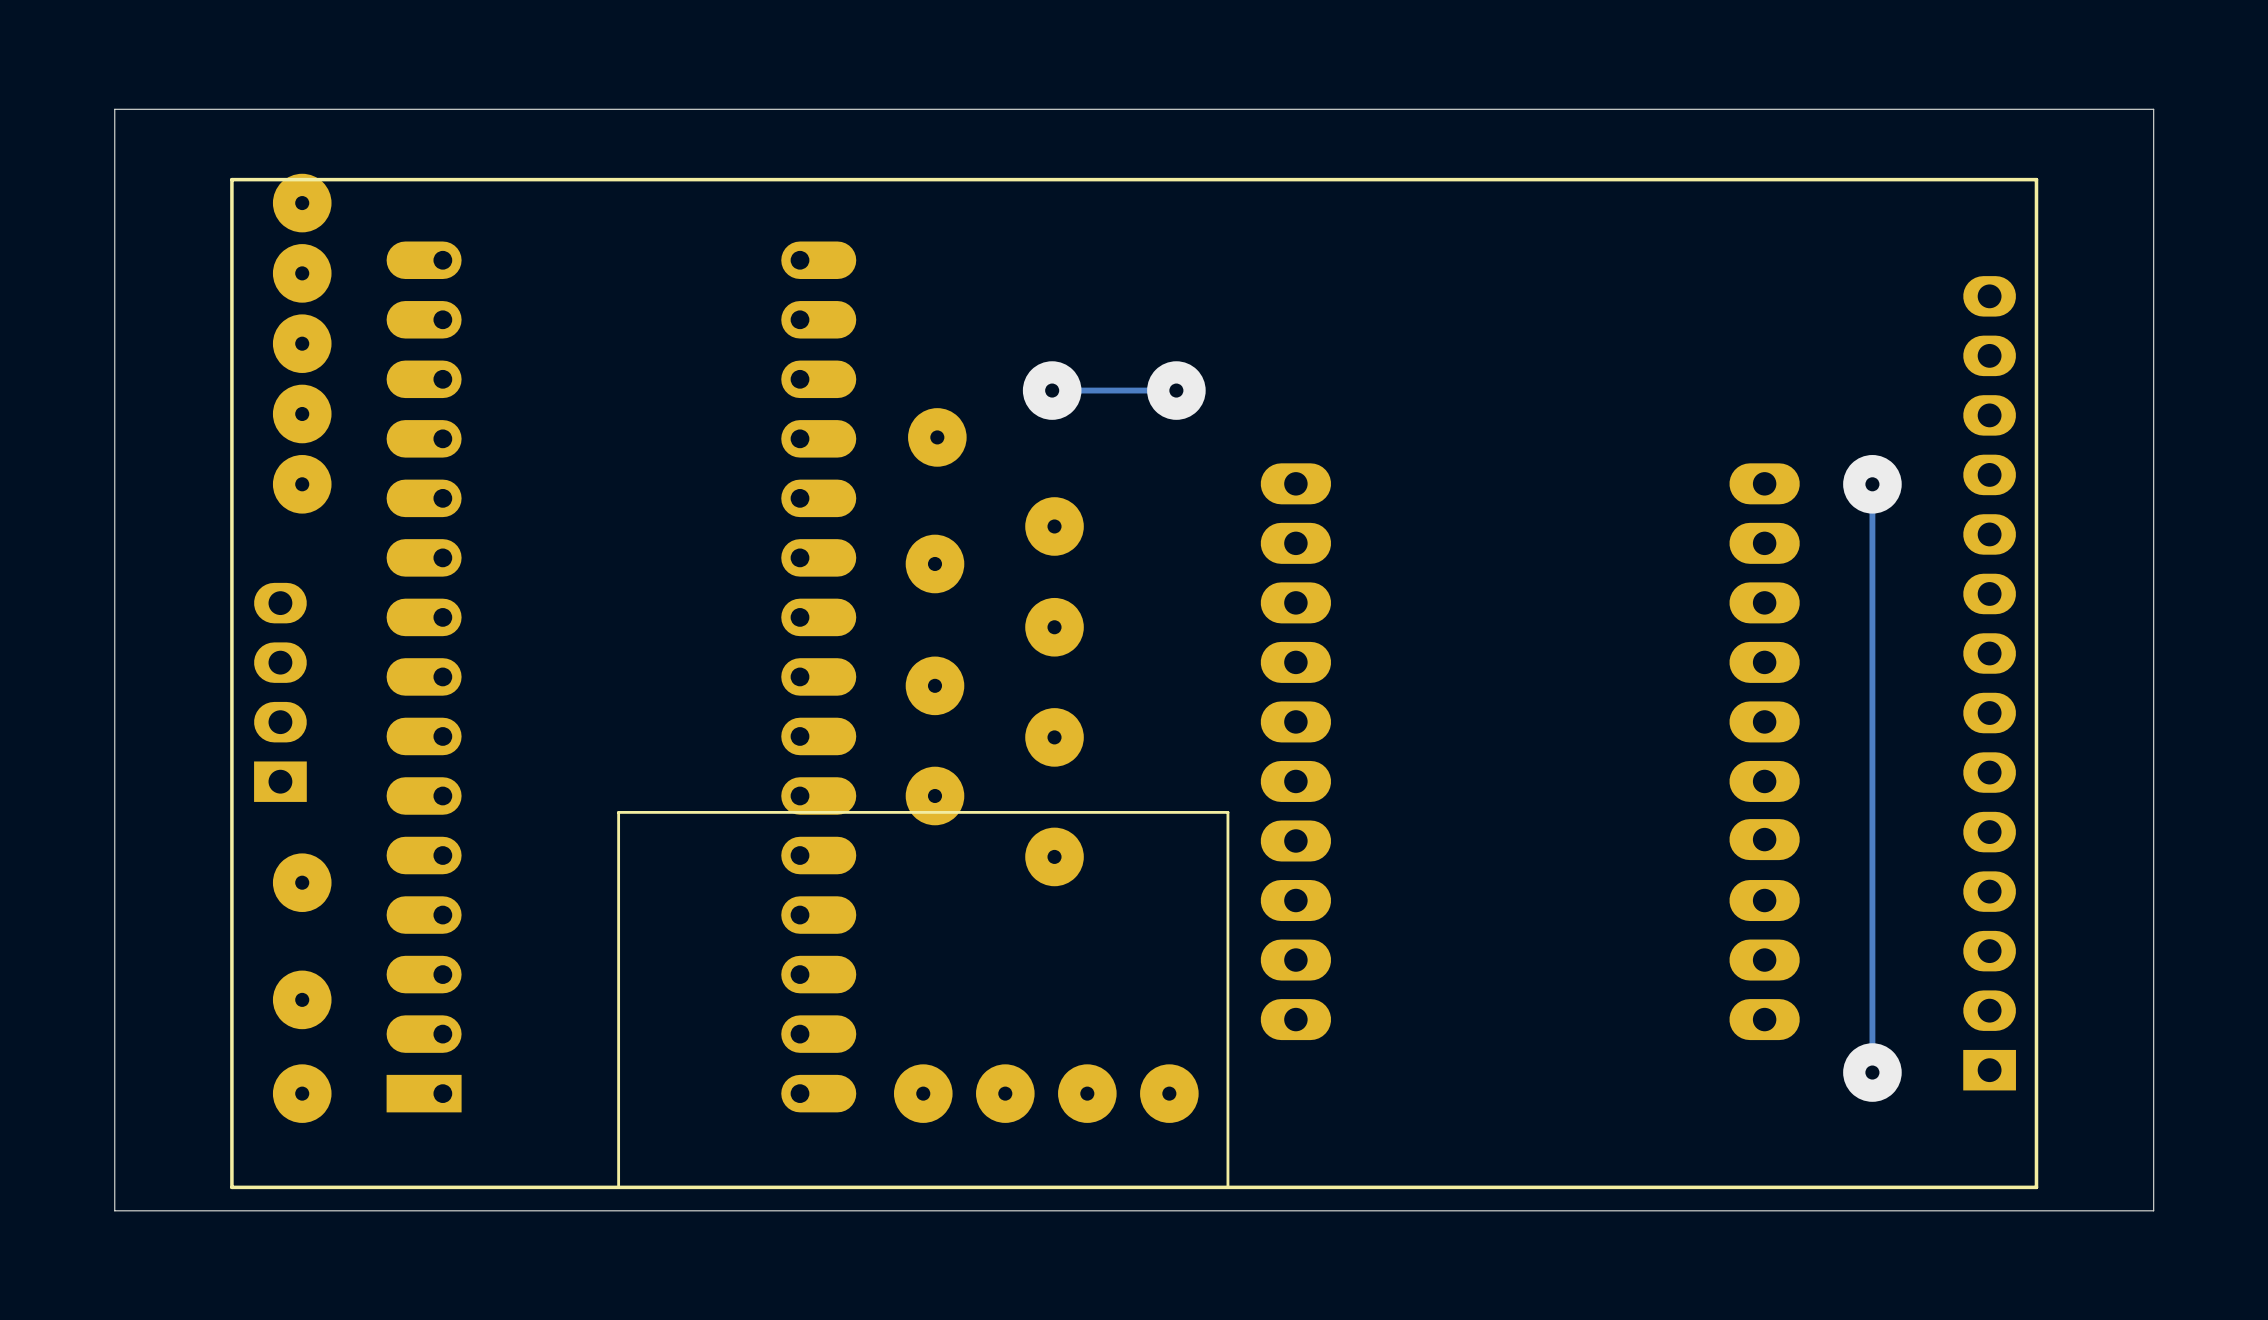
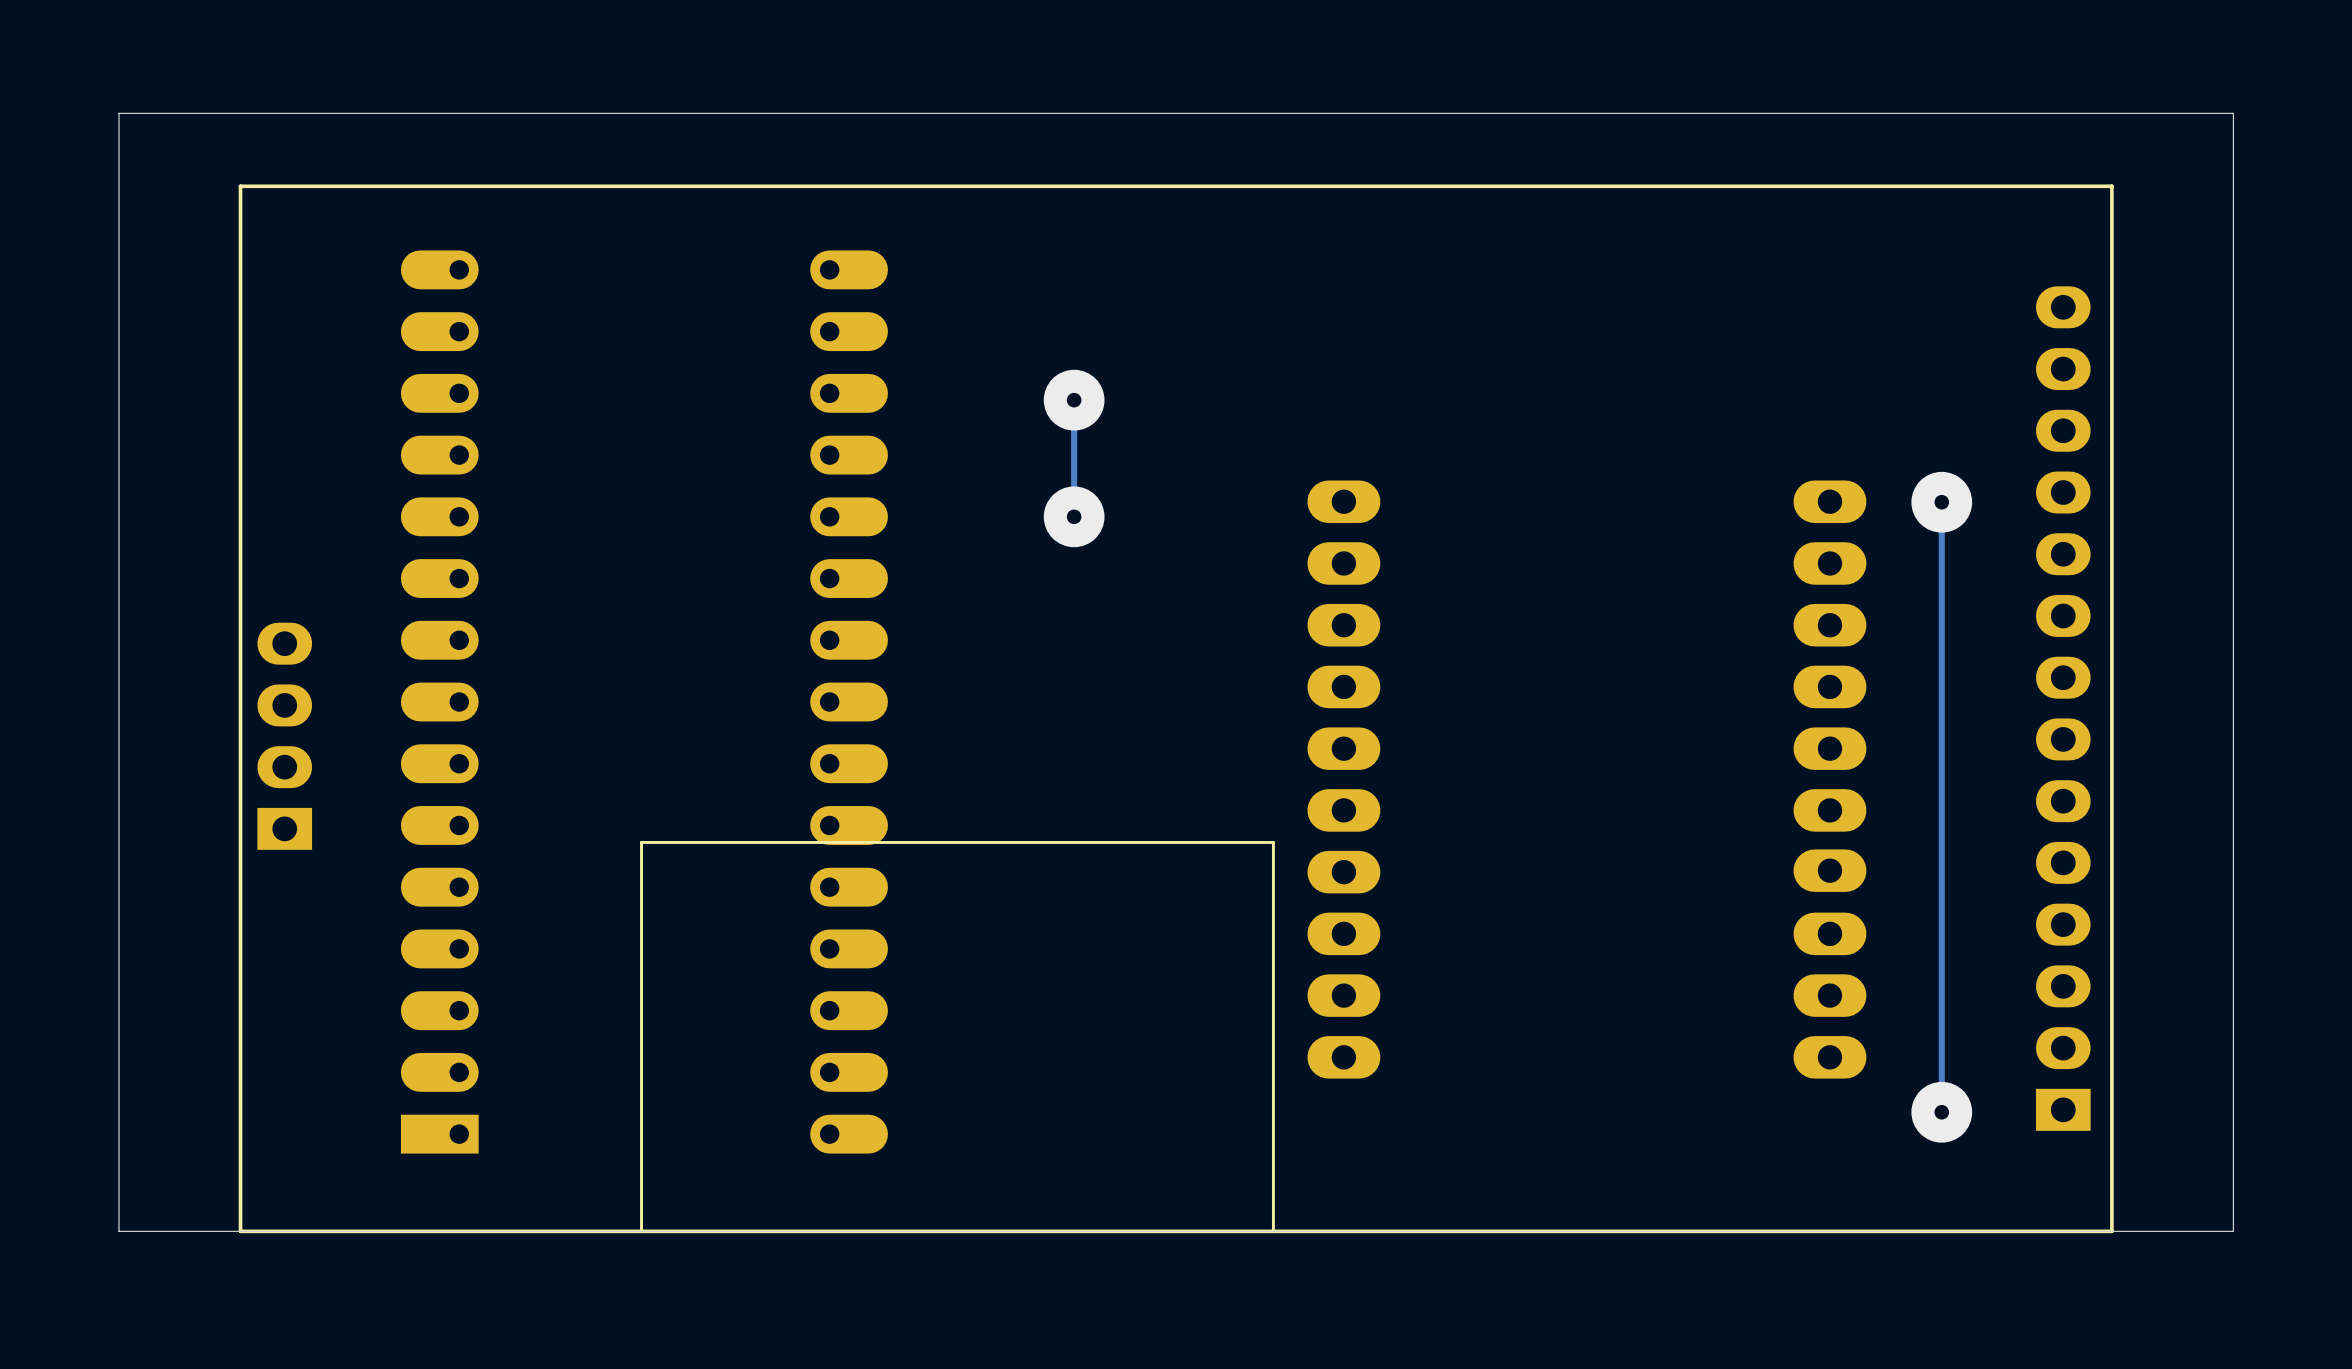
part footprint: [230, 177, 2039, 1190] -> [238, 184, 2114, 1234]
part: (302, 203) -> none
part: (302, 273) -> none
part: (302, 343) -> none
track: none -> (1074, 400) (1074, 516)
via position: (1052, 390) -> (1074, 400)
via: (1176, 390) -> none
track: (1181, 390) (1052, 390) -> none
part: (302, 413) -> none
part: (937, 437) -> none
part: (302, 484) -> none
via: none -> (1074, 516)
part: (1054, 526) -> none
part: (934, 563) -> none
part: (1054, 627) -> none
part: (934, 685) -> none
part: (1054, 737) -> none
part: (934, 795) -> none
part: (1054, 856) -> none
part: (302, 882) -> none
part: (302, 999) -> none
part: (302, 1093) -> none
part: (923, 1093) -> none
part: (1005, 1093) -> none
part: (1087, 1093) -> none
part: (1169, 1093) -> none
board edge: (2153, 1187) (2153, 1210) (114, 1210) (114, 1187) -> (2233, 1231) (118, 1231)

